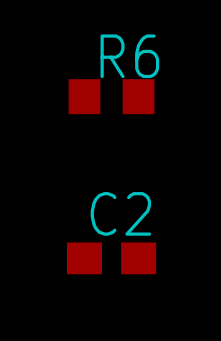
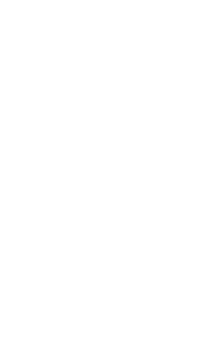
R6: (111, 96) -> none
C2: (111, 258) -> none

